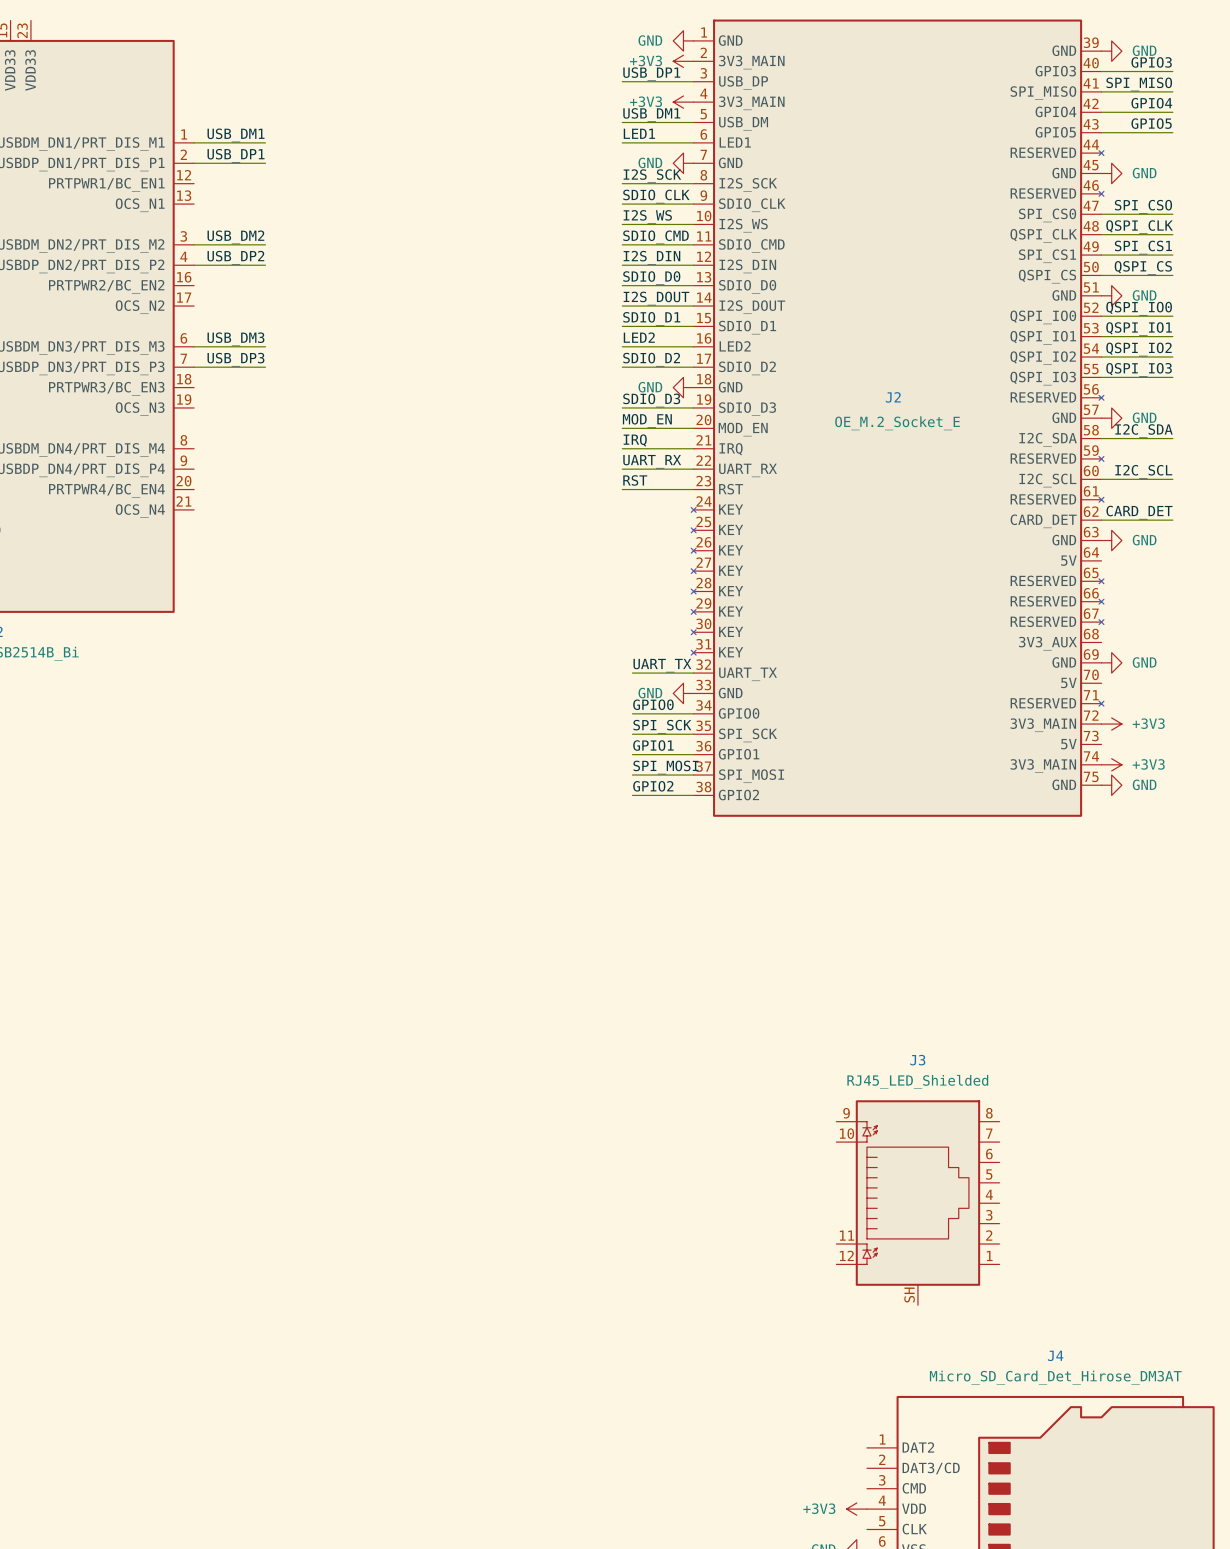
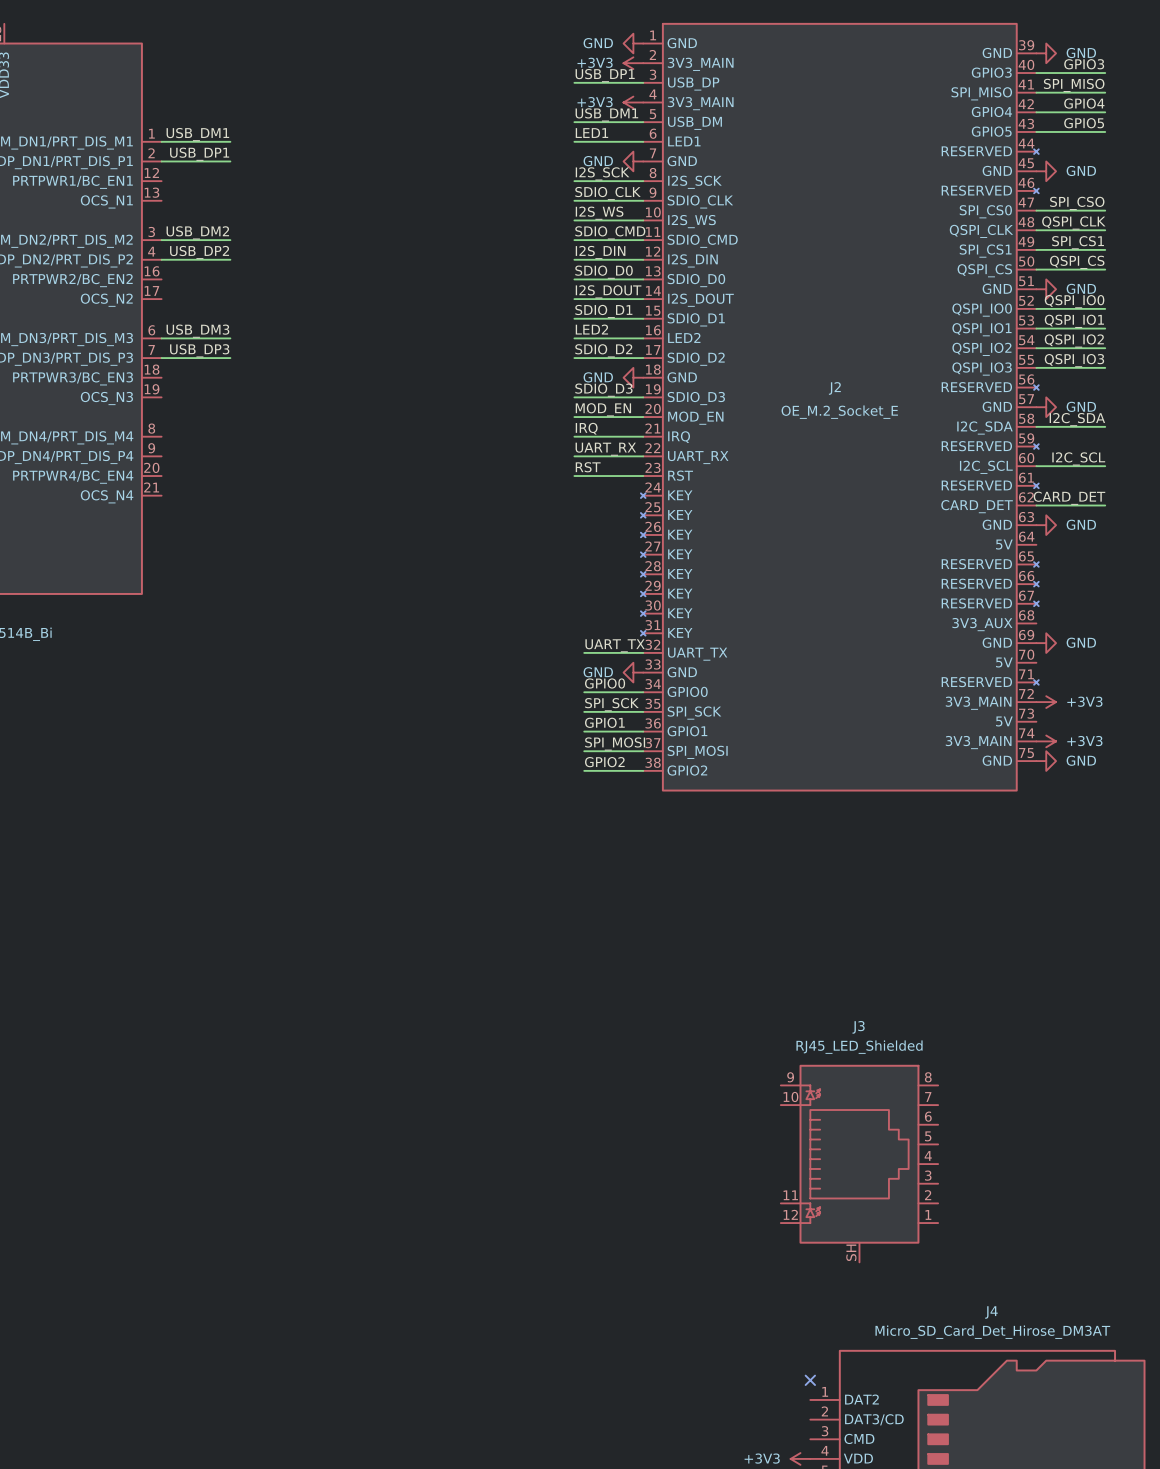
no-connect mark: none -> (810, 1380)

